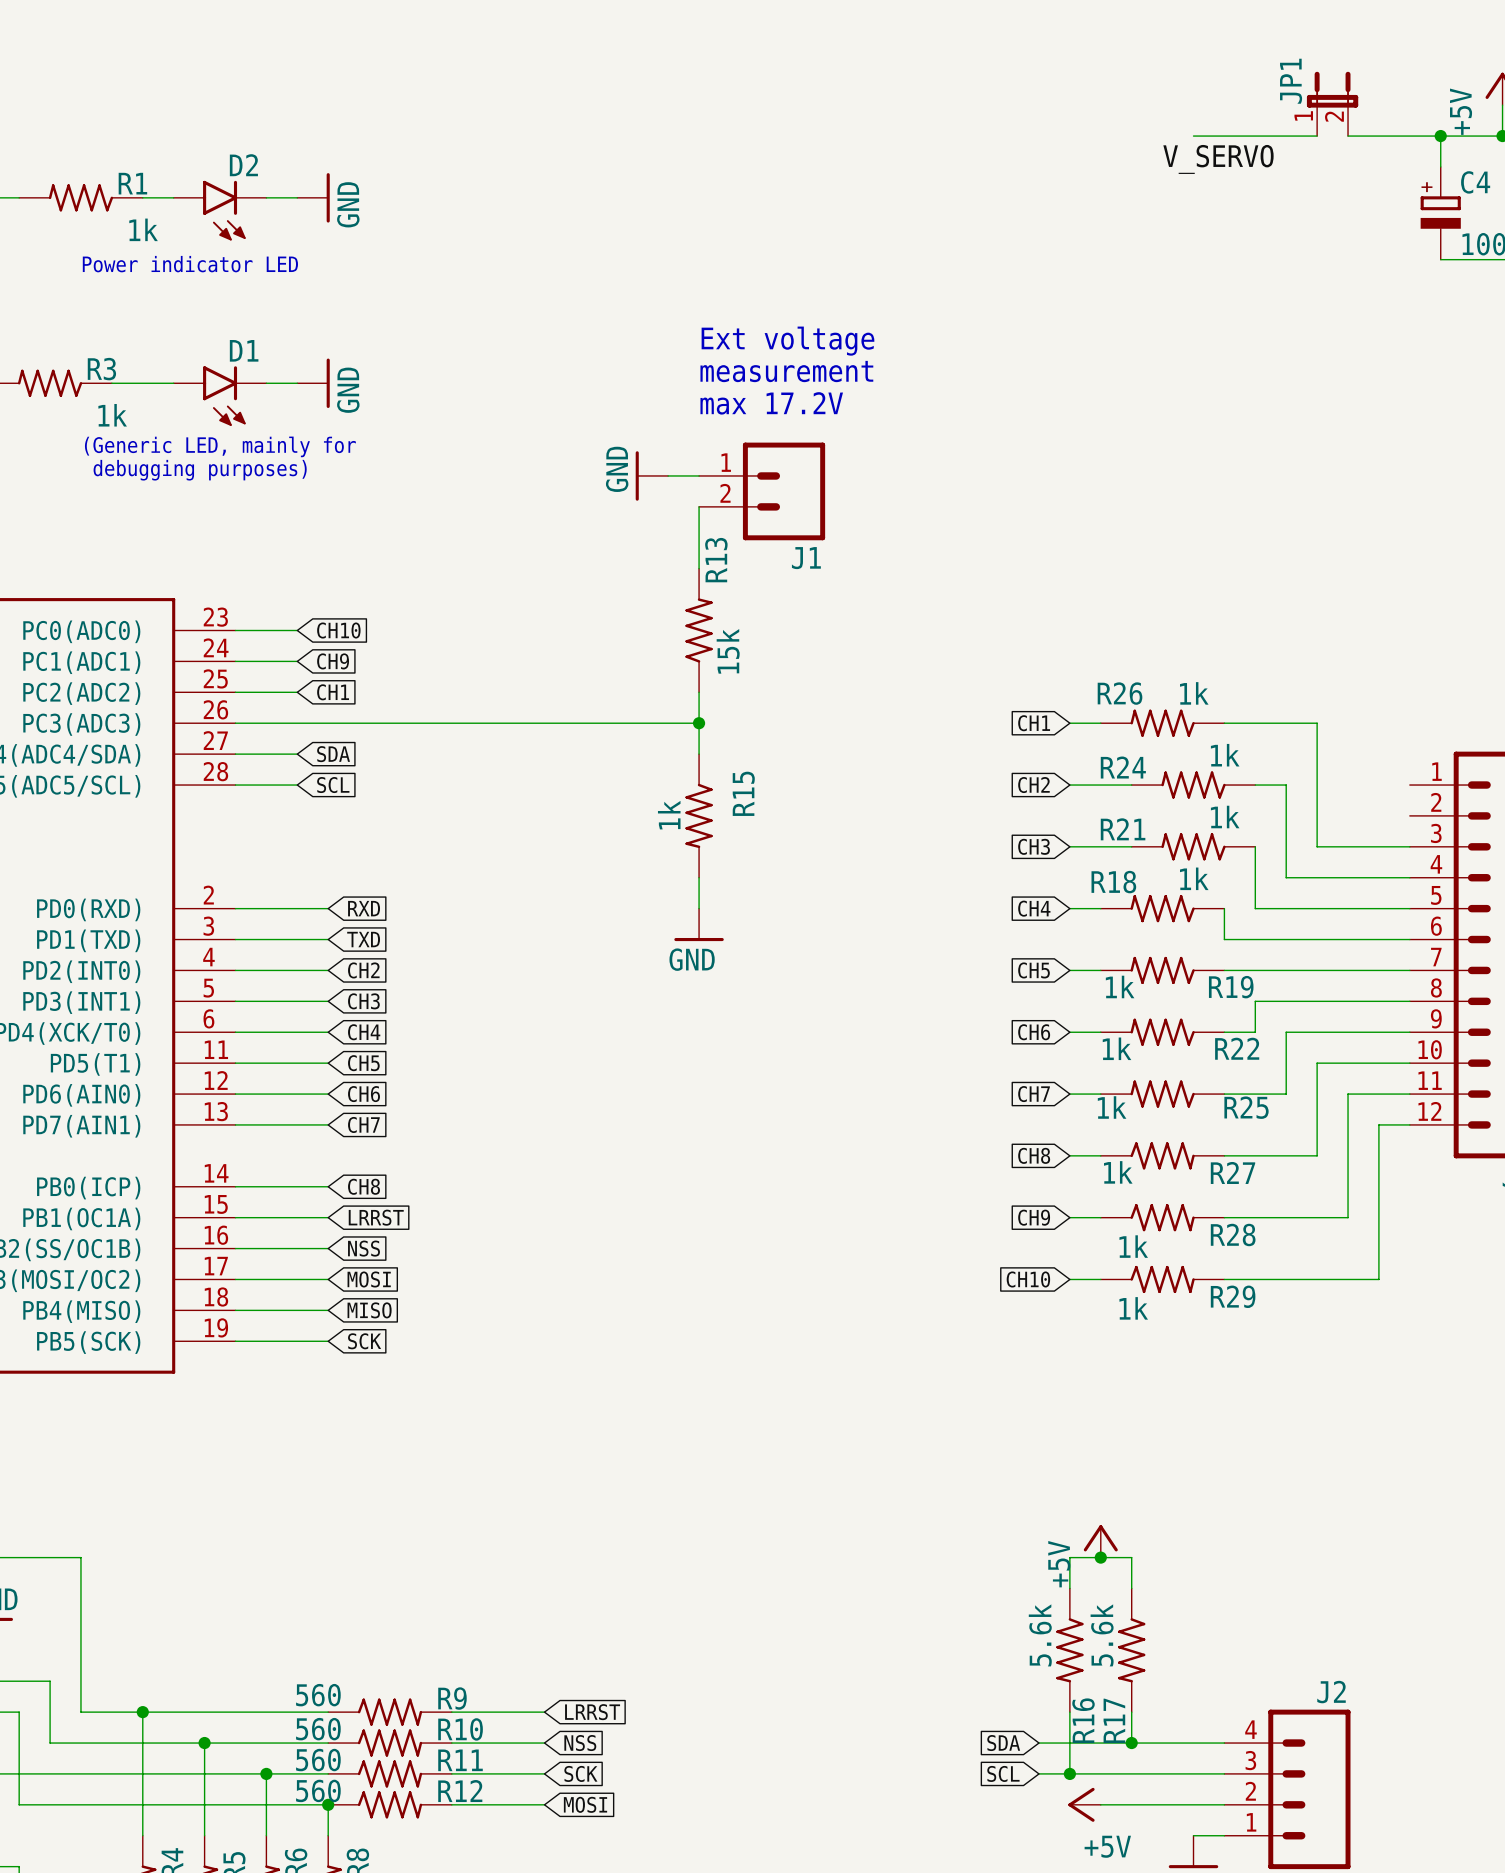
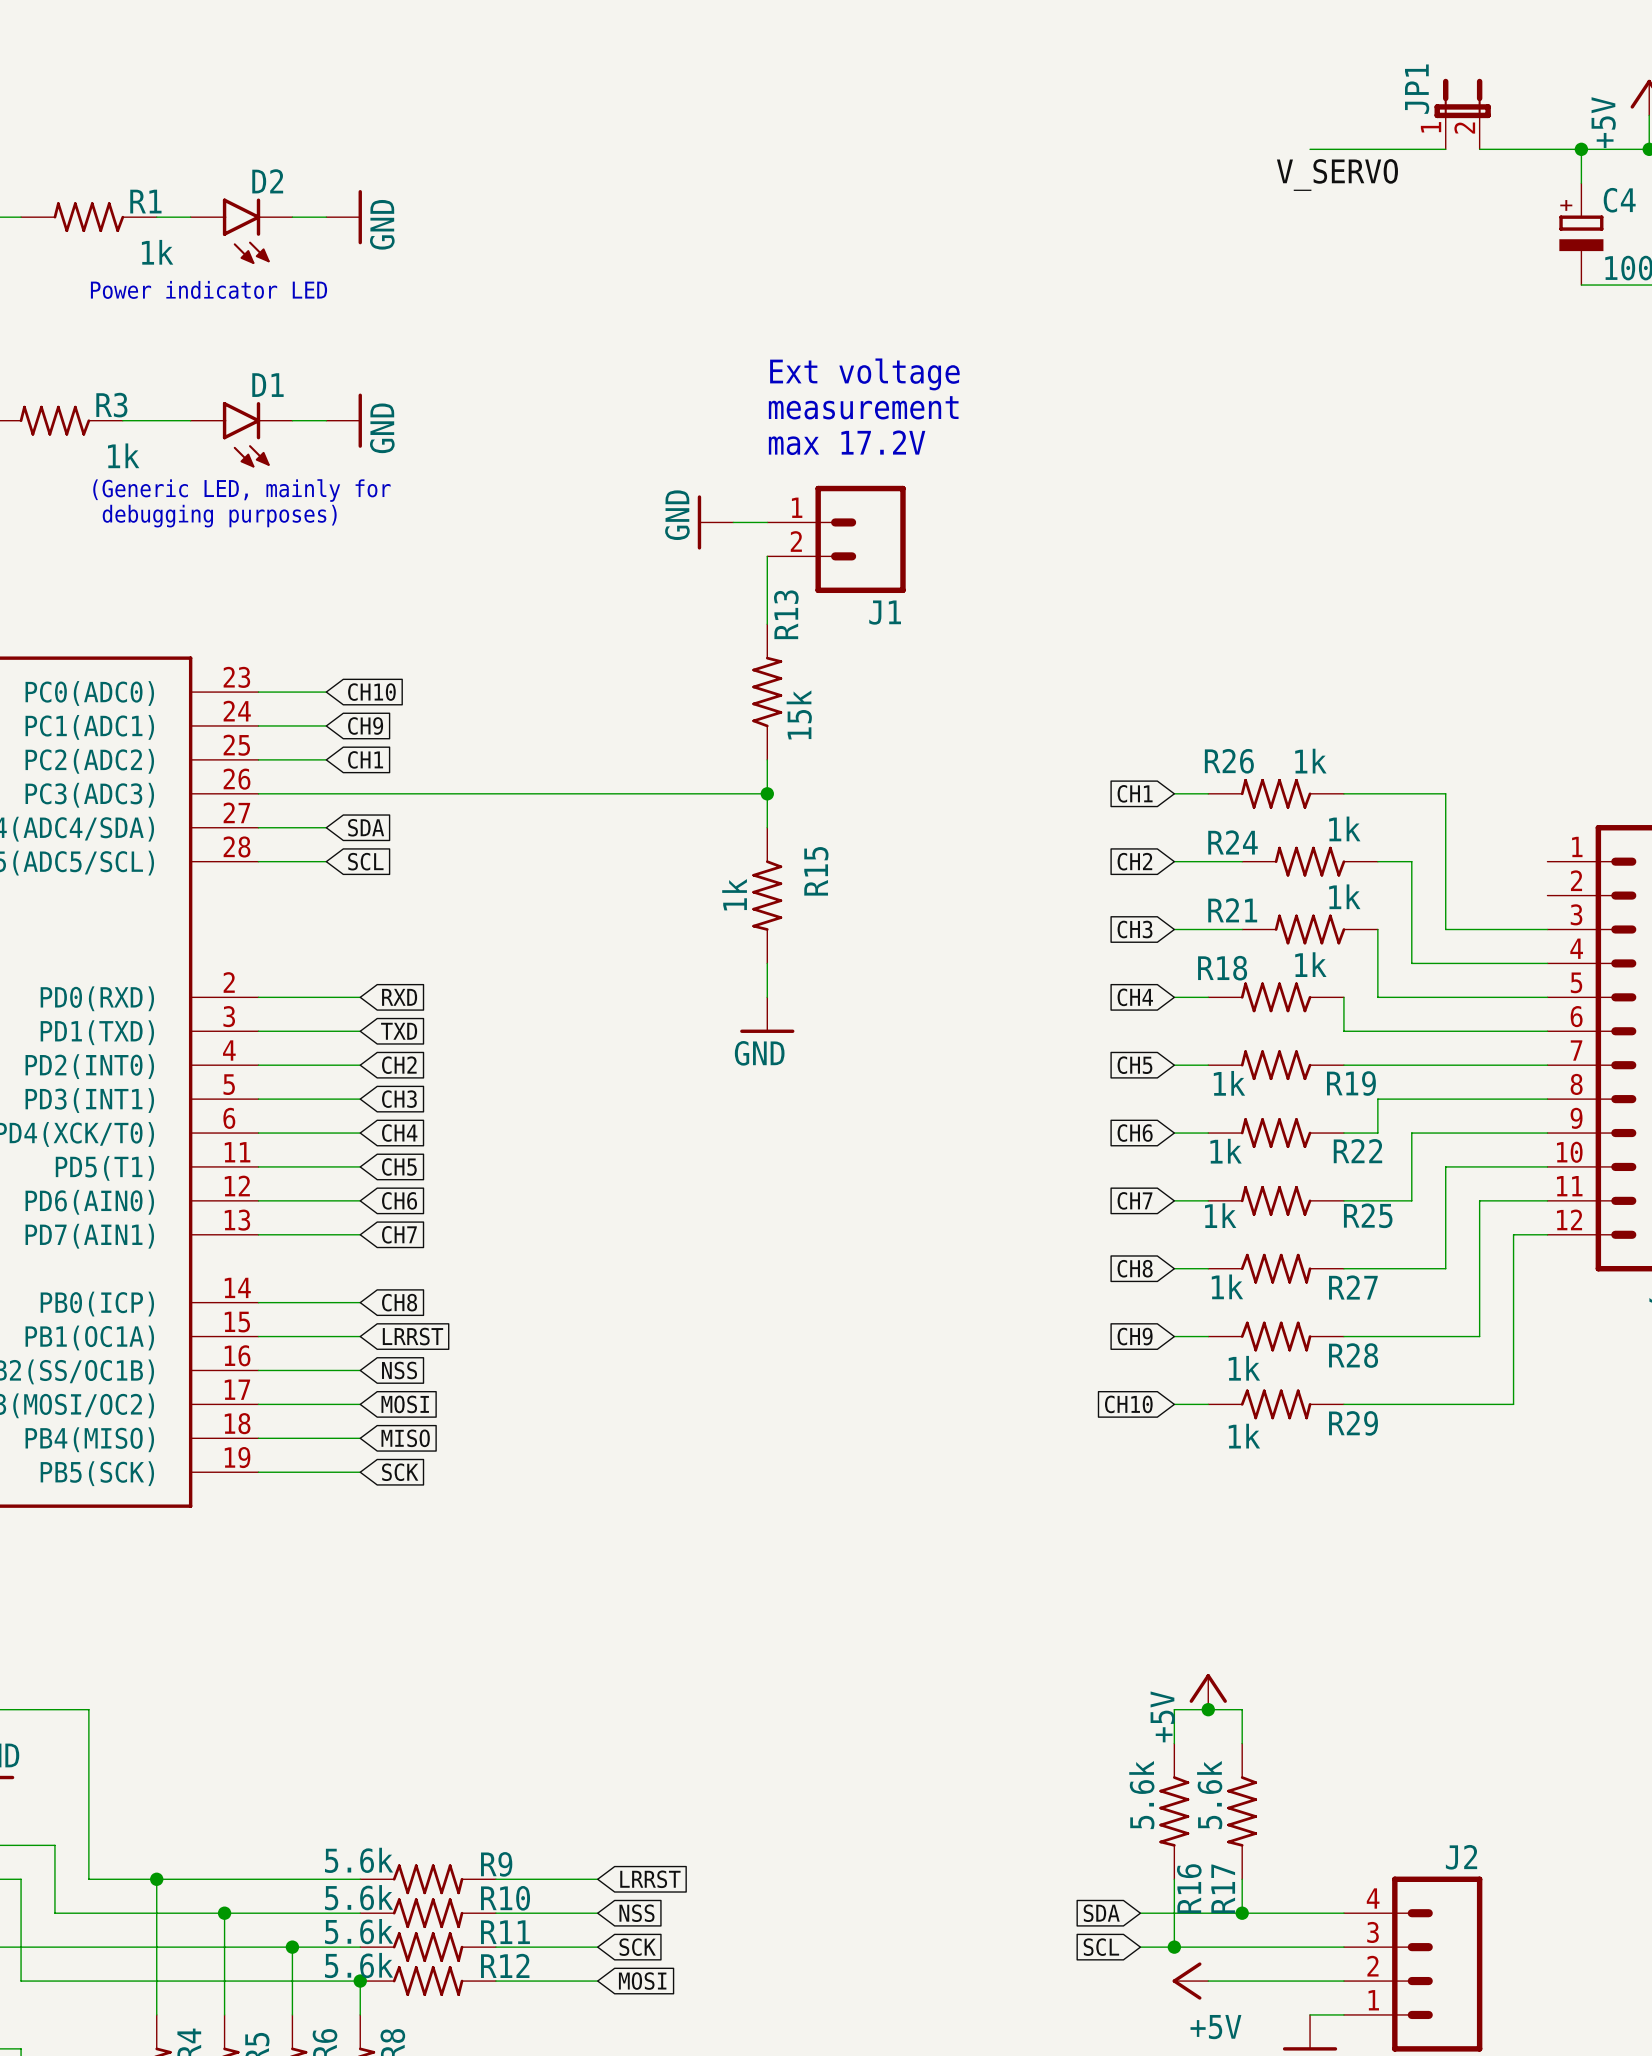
R9 value: 560 (318, 1695) -> 5.6k (359, 1860)
R10 value: 560 (318, 1729) -> 5.6k (359, 1897)
R11 value: 560 (318, 1760) -> 5.6k (359, 1931)
R12 value: 560 (318, 1790) -> 5.6k (359, 1965)

